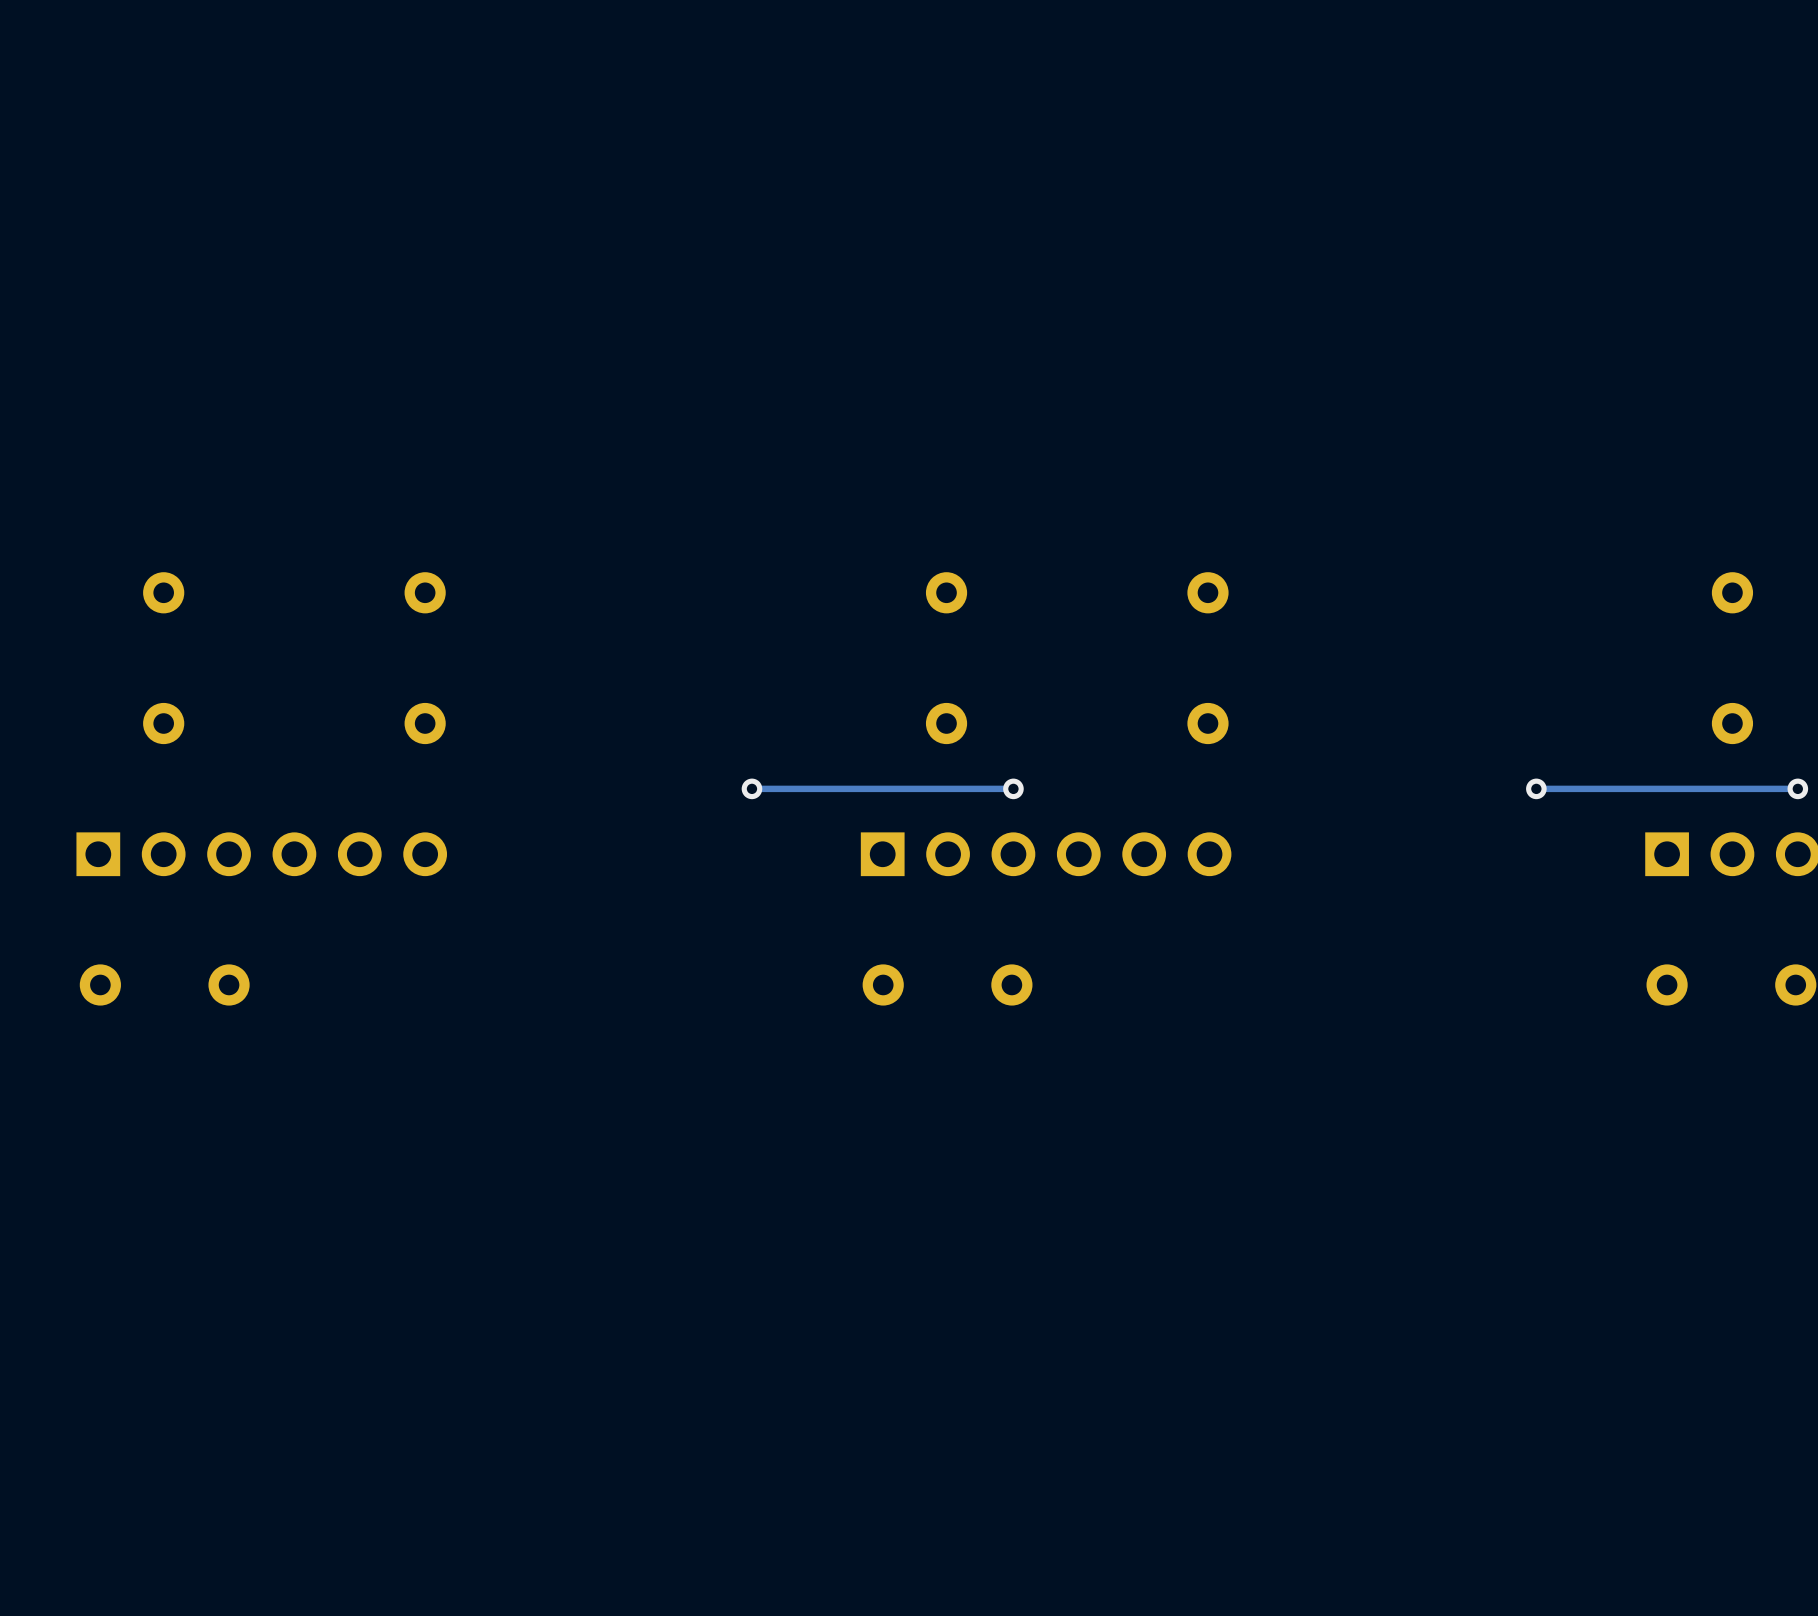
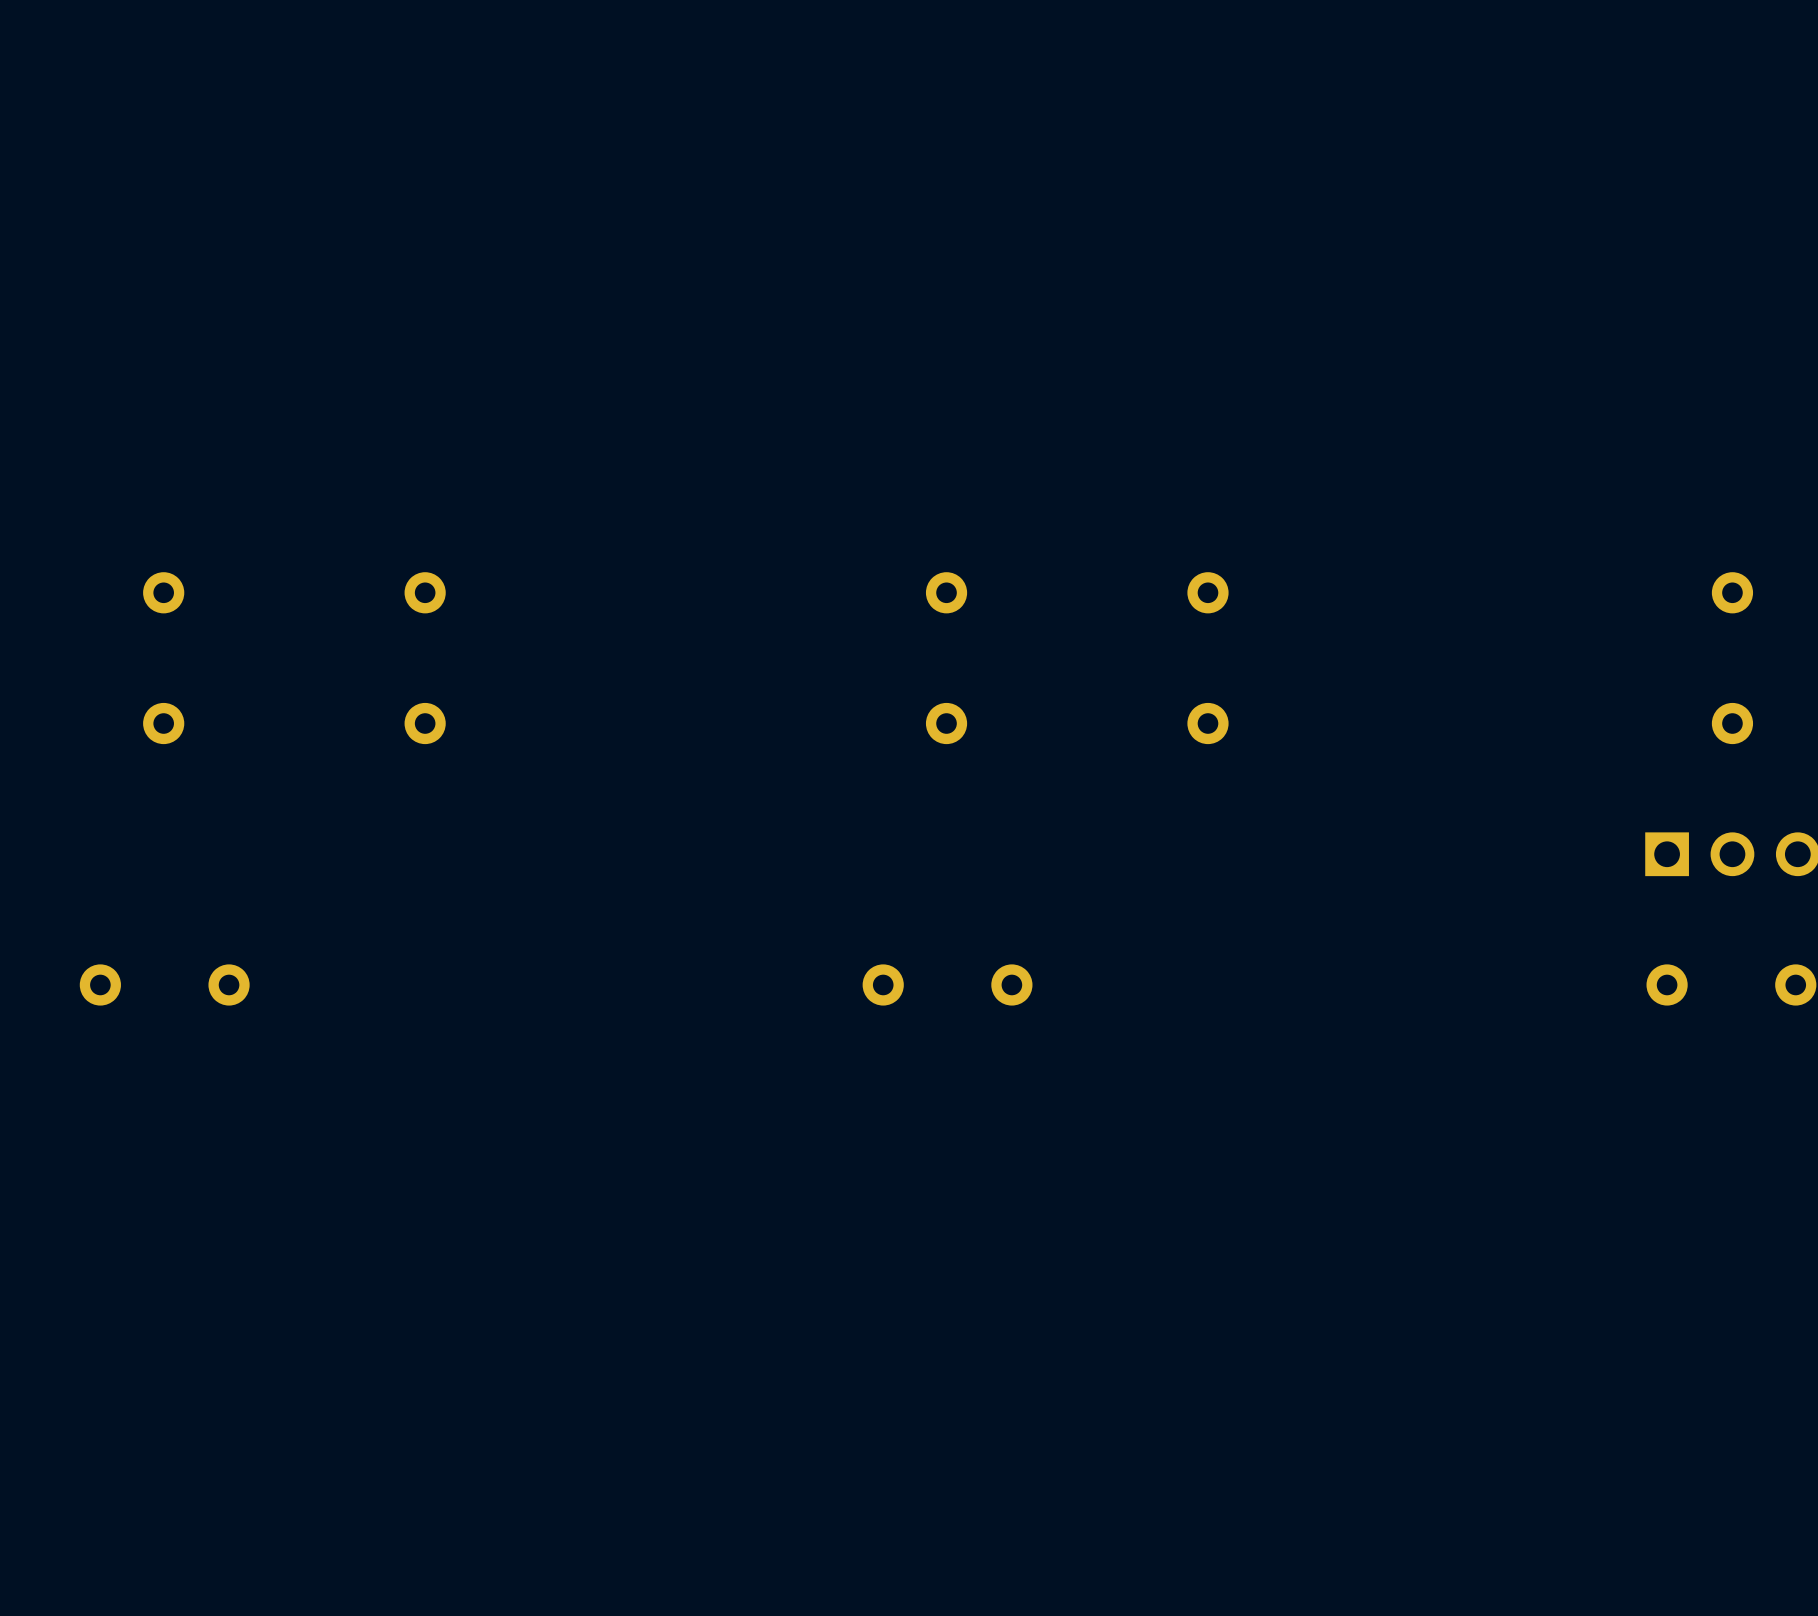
via: (751, 788) -> none
track: (1013, 788) (751, 788) -> none
via: (1013, 788) -> none
via: (1536, 788) -> none
track: (1797, 788) (1536, 788) -> none
via: (1797, 788) -> none
part: (261, 854) -> none
part: (1046, 854) -> none

